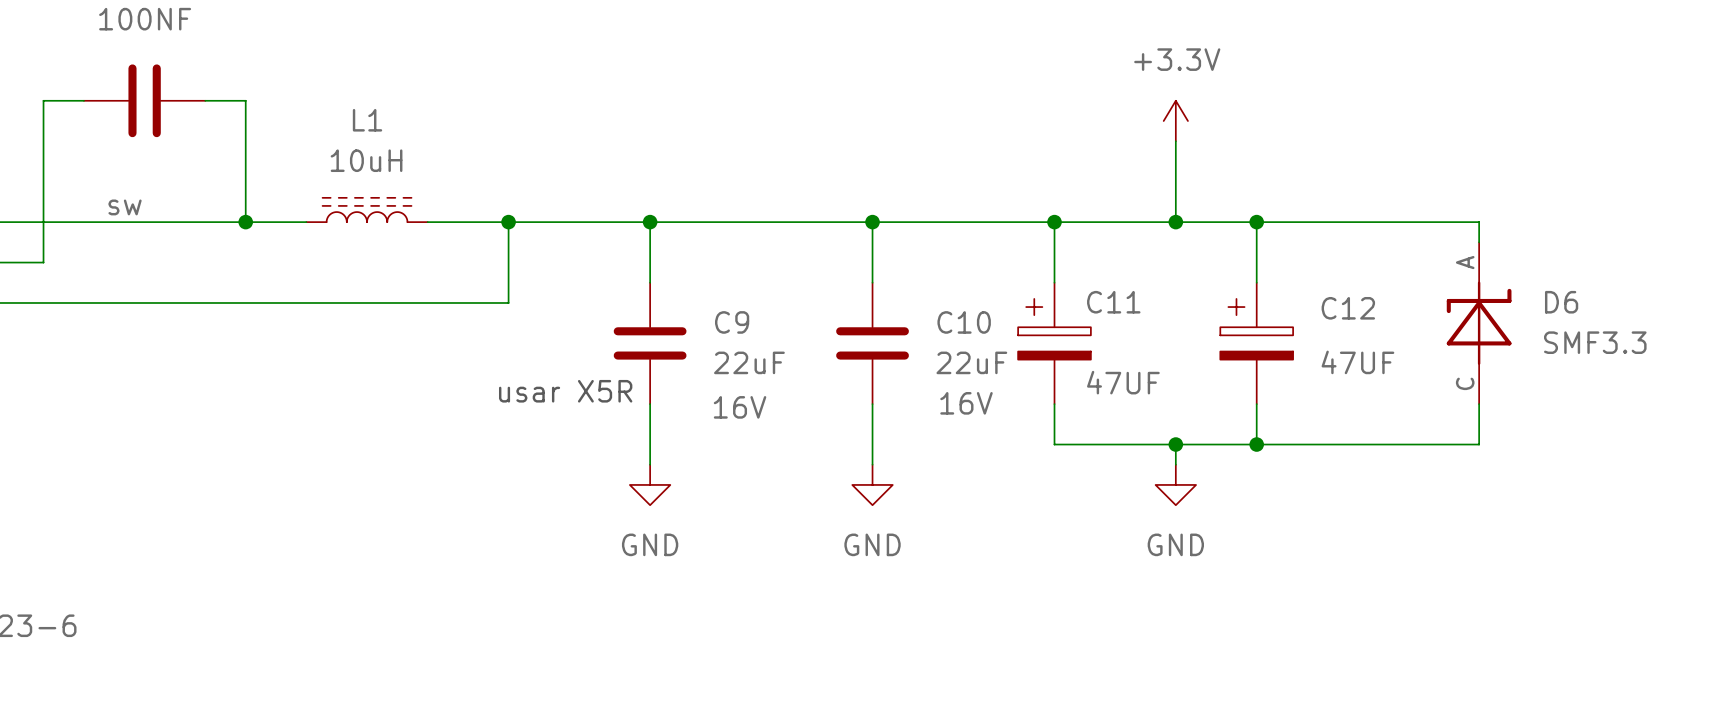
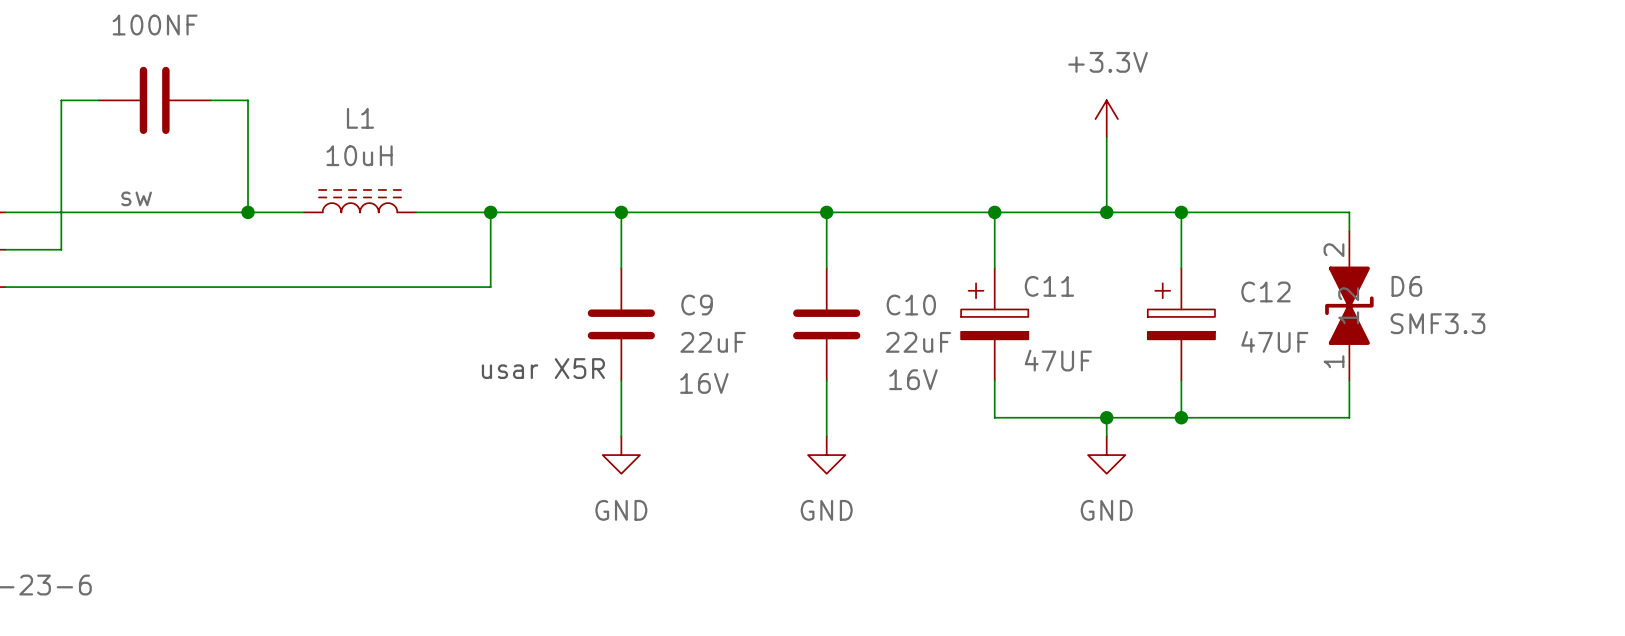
wire: (1438, 222) (1479, 222) (1479, 242) -> (1349, 212) (1349, 231)
D6 symbol: [1446, 242, 1512, 405] -> [1325, 231, 1374, 381]
wire: (1479, 404) (1479, 444) (1438, 444) -> (1349, 380) (1349, 417)

